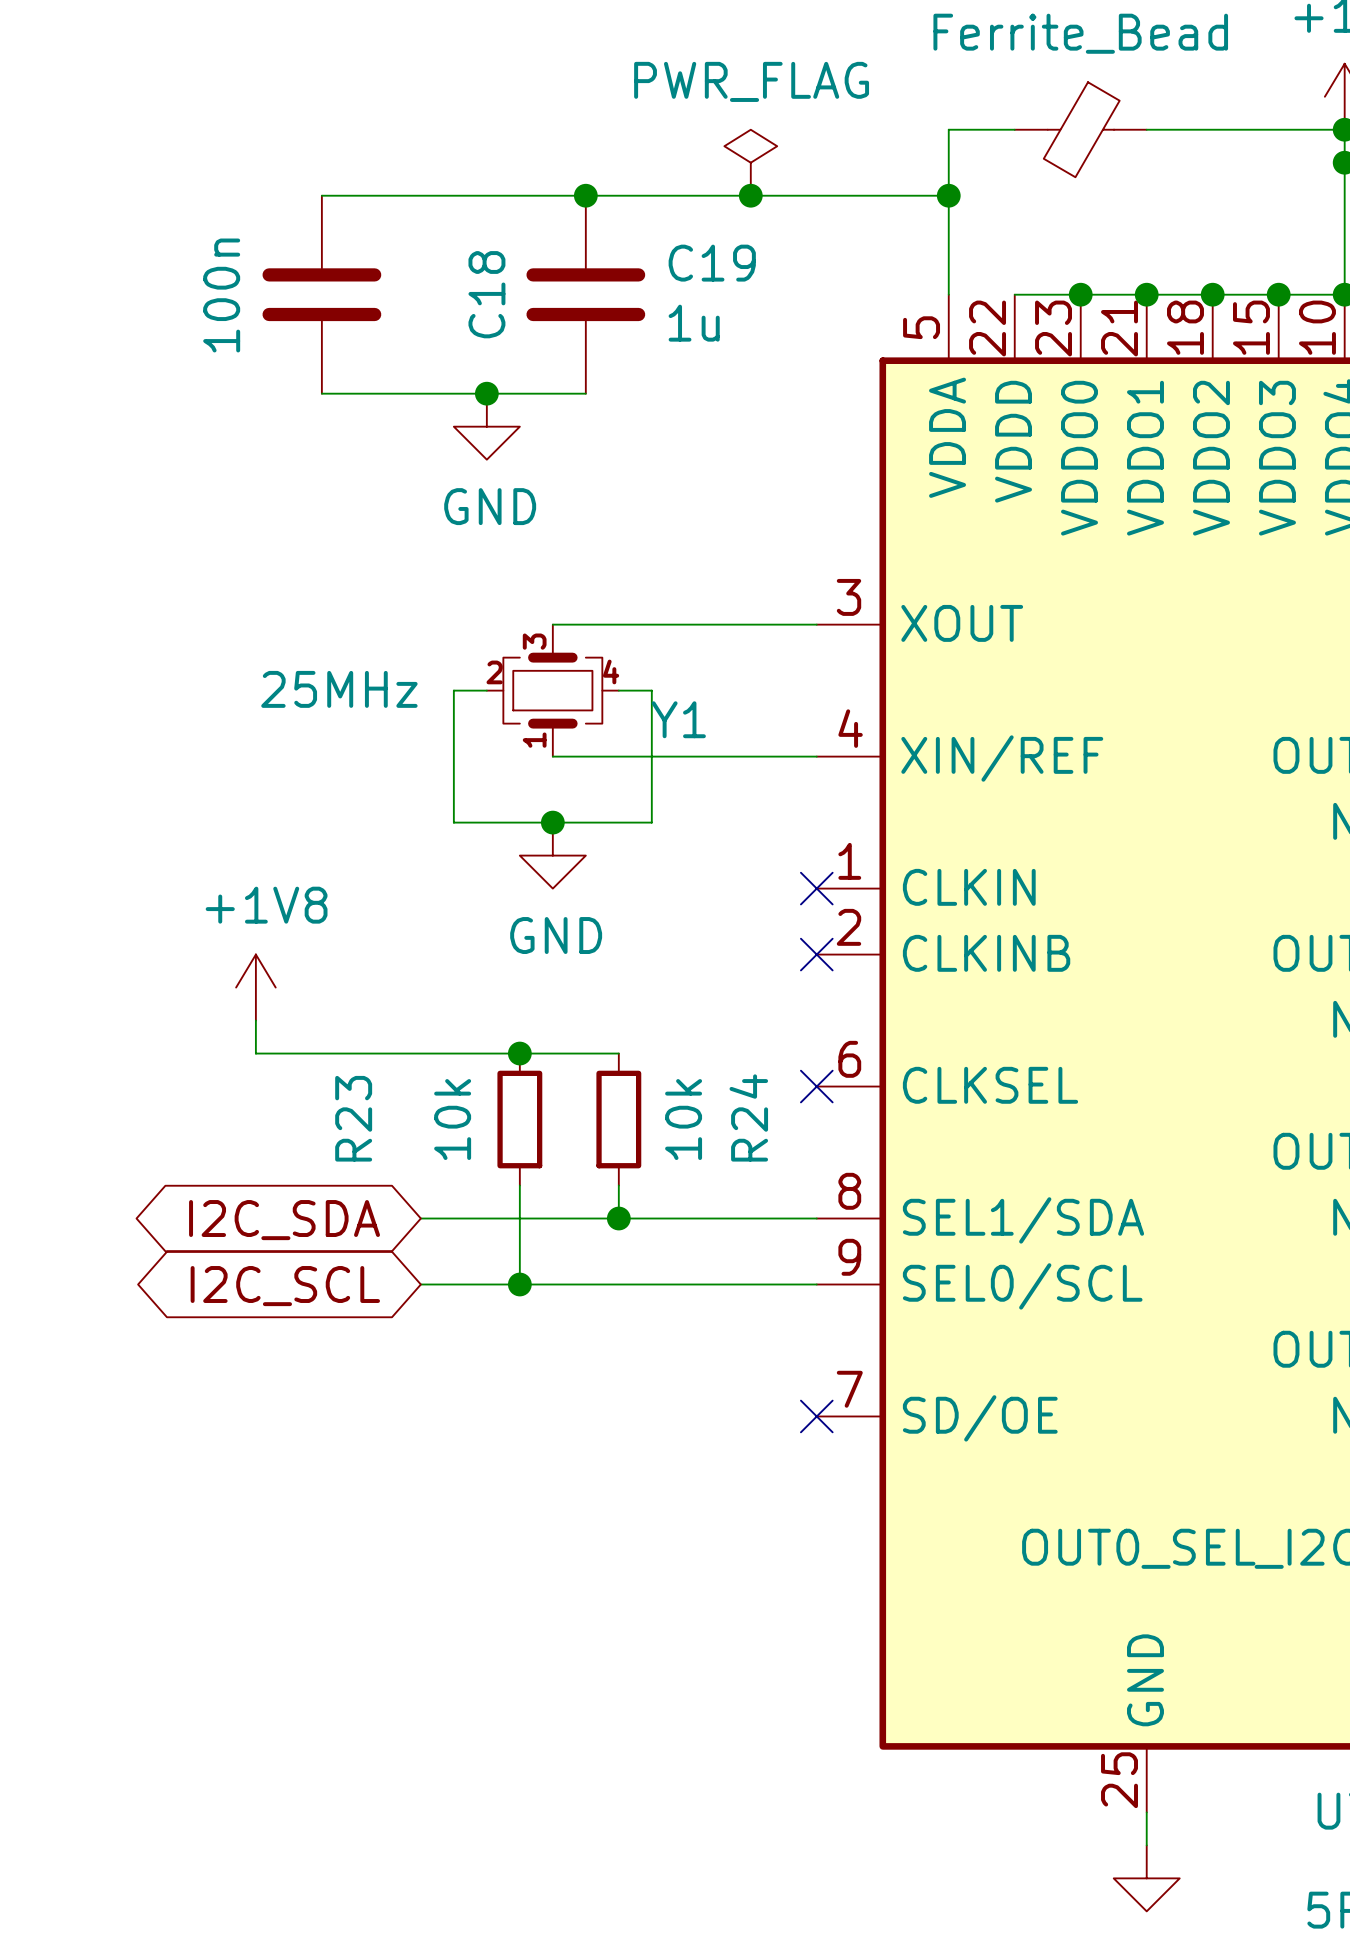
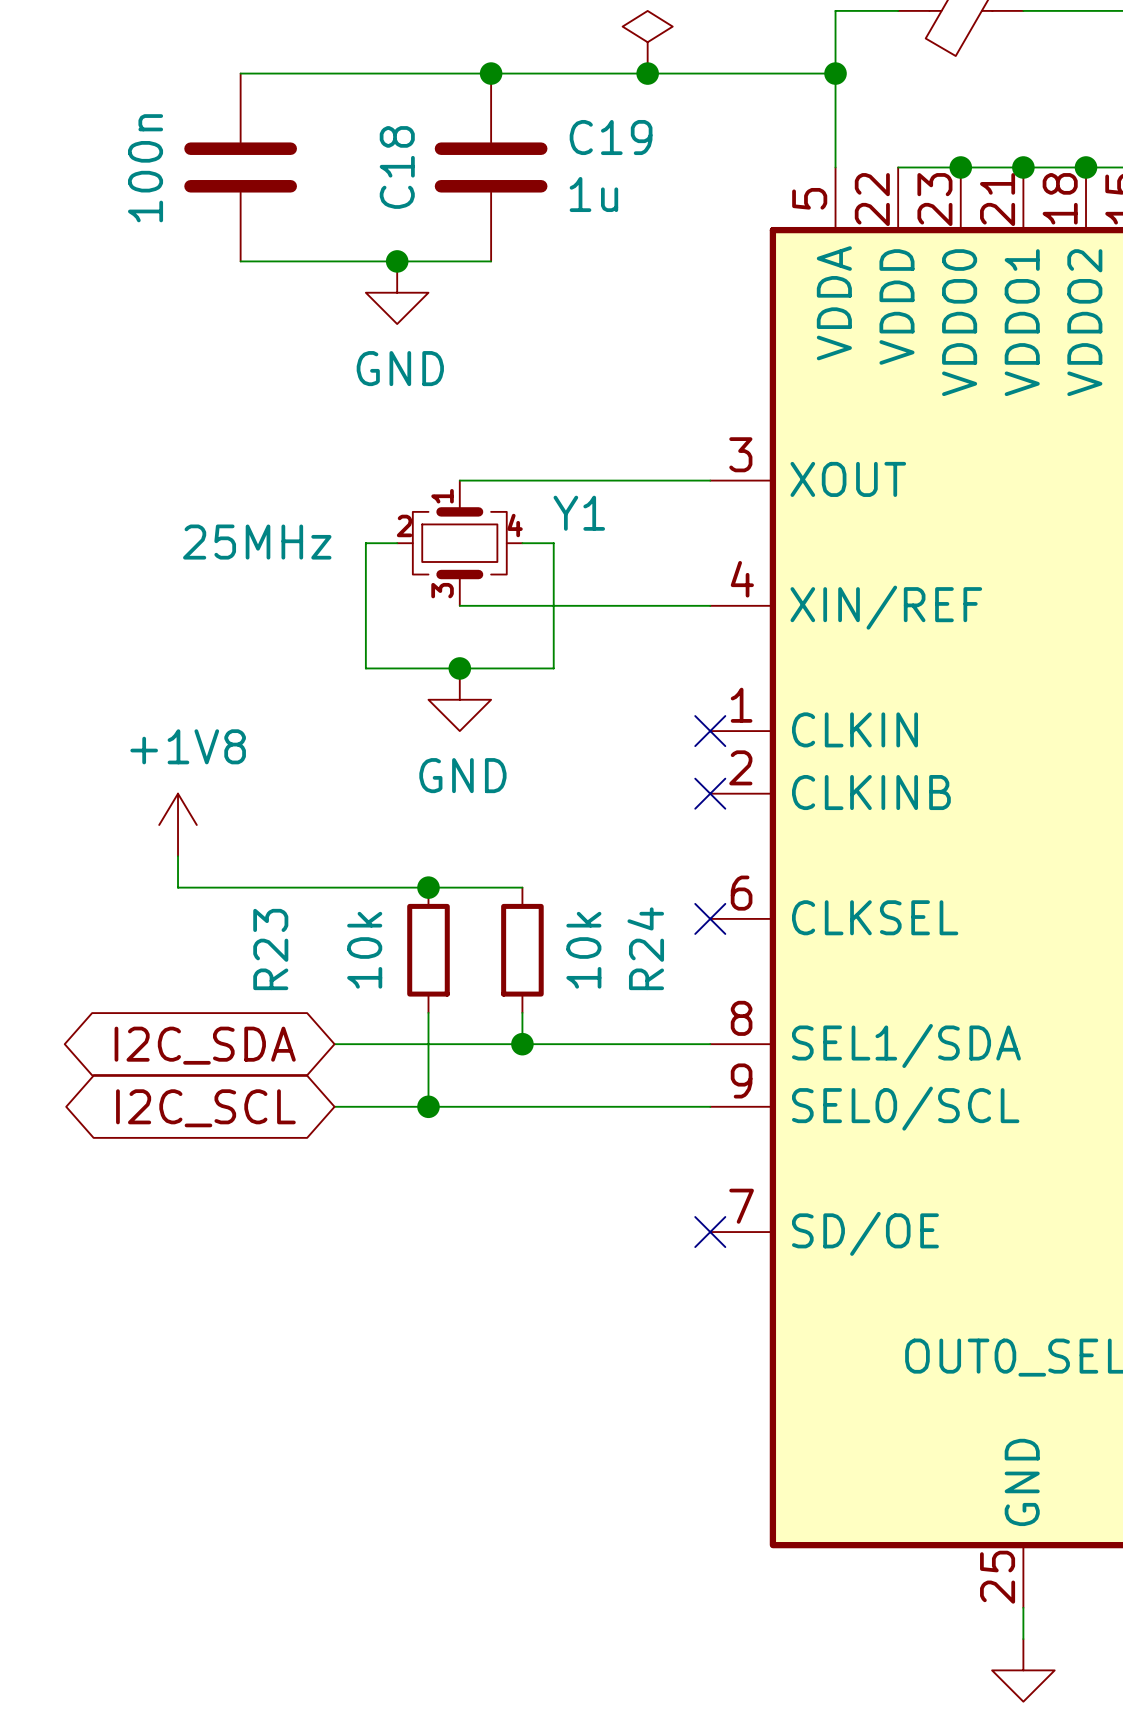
Y1 flip: as is (552, 690) -> up-down (459, 543)

